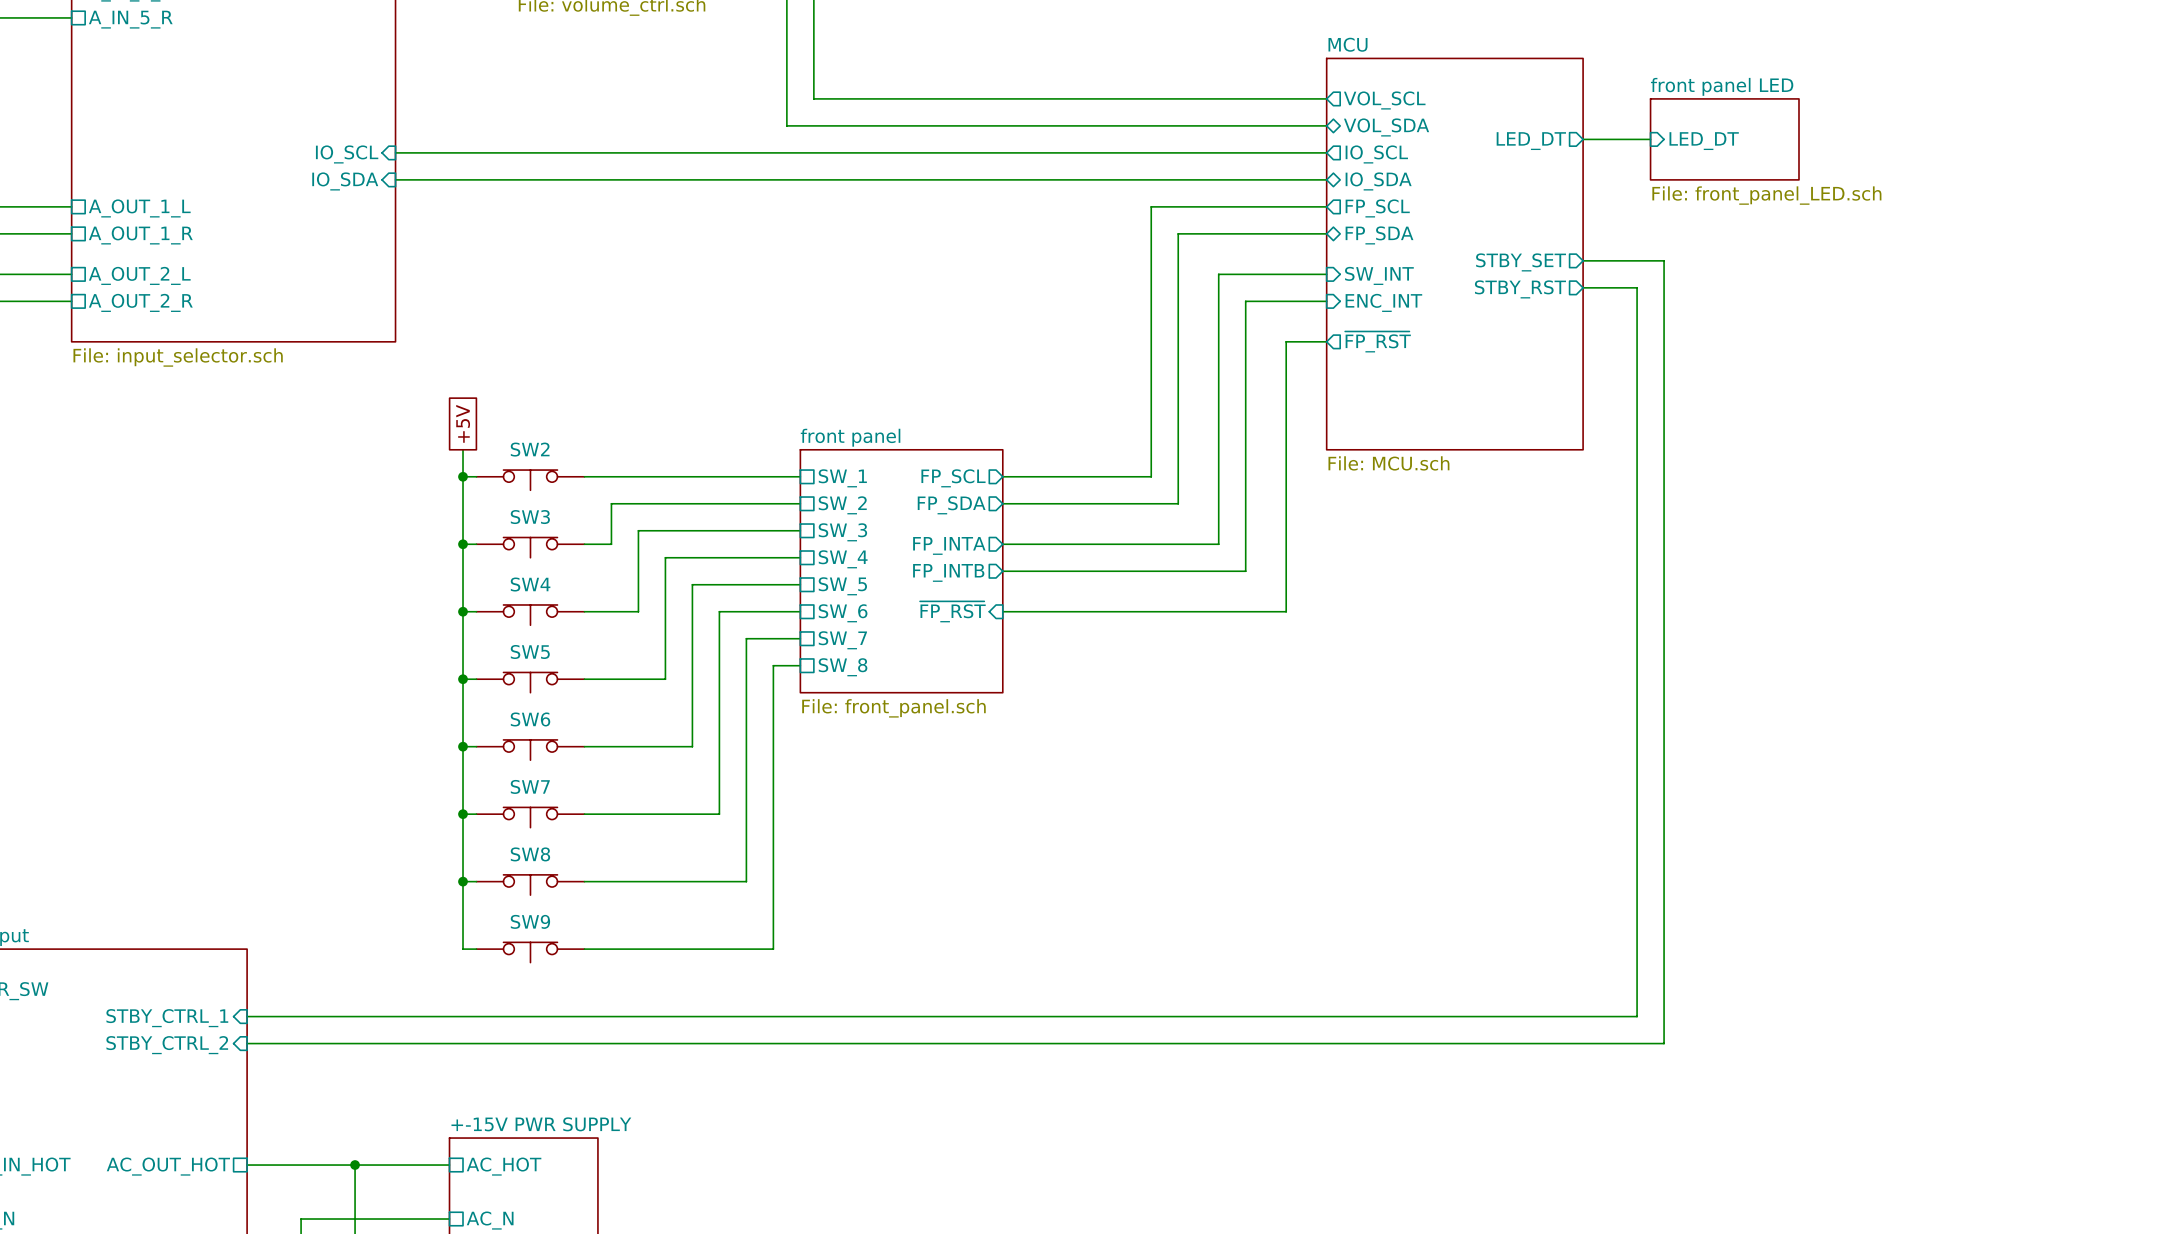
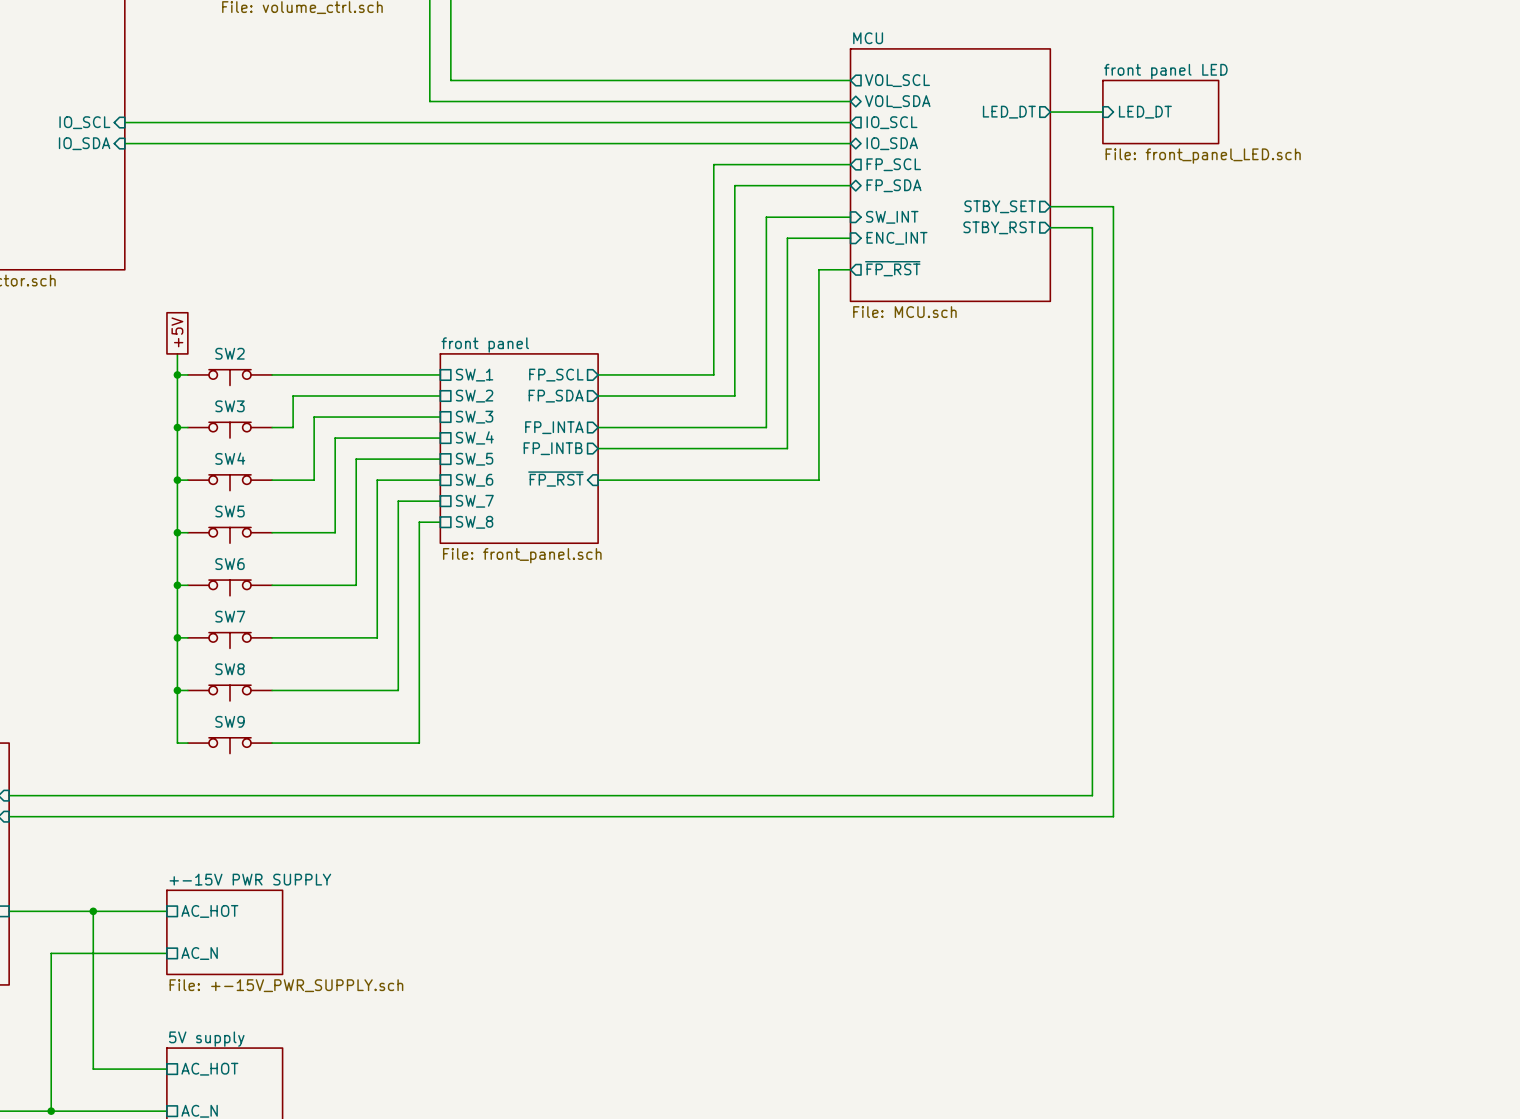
sheet MCU: none -> File: MCU.sch (950, 175)
sheet MCU: File: MCU.sch (1454, 254) -> none

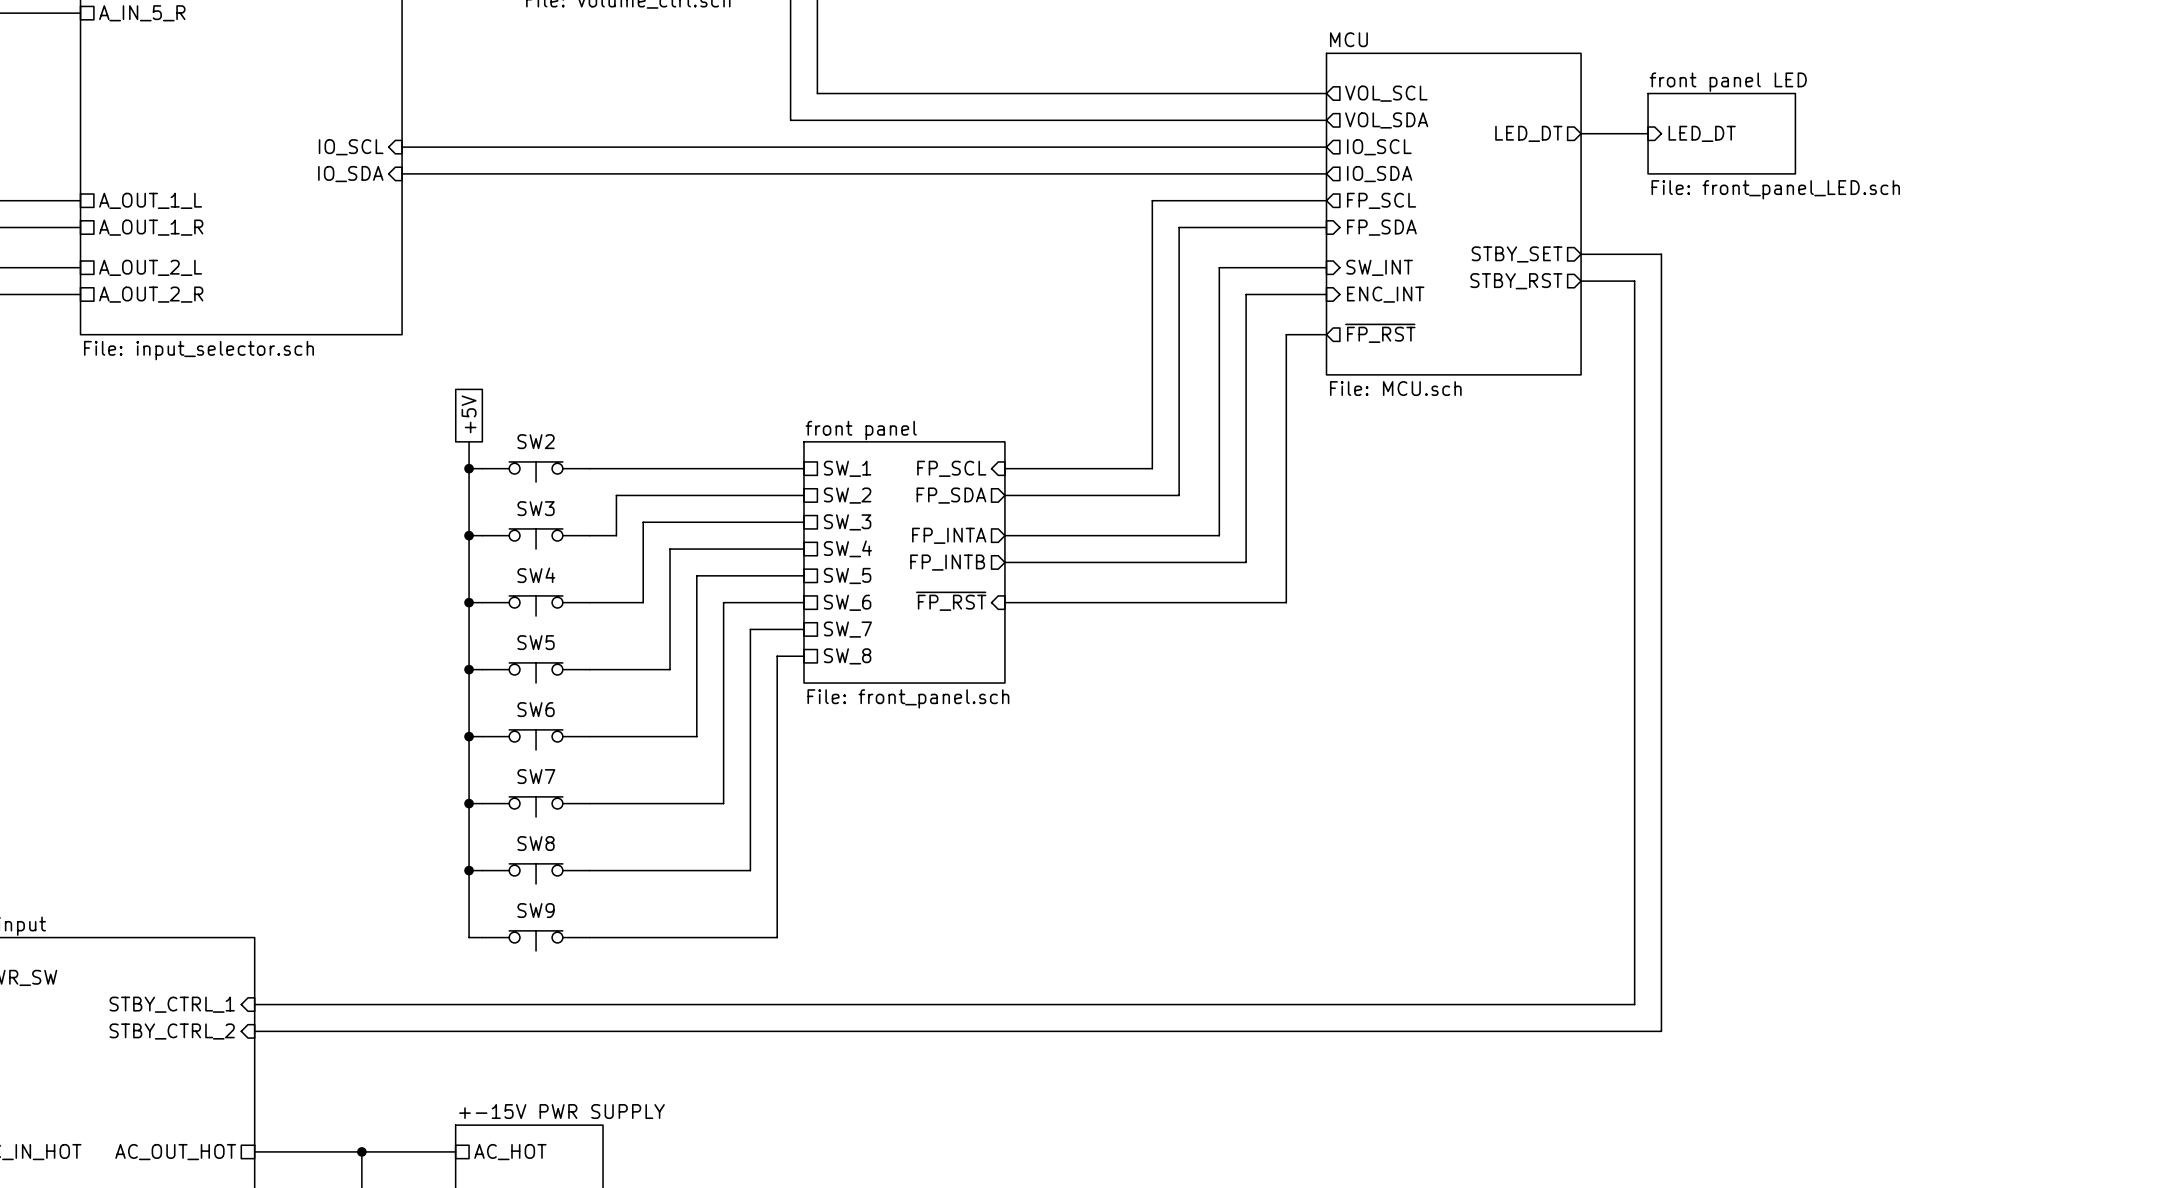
sheet pin shape: bidirectional (897, 101) -> output (1386, 120)
sheet pin shape: bidirectional (892, 143) -> output (1379, 174)
sheet pin shape: bidirectional (893, 185) -> input (1381, 227)
sheet pin shape: output (556, 375) -> input (951, 468)

